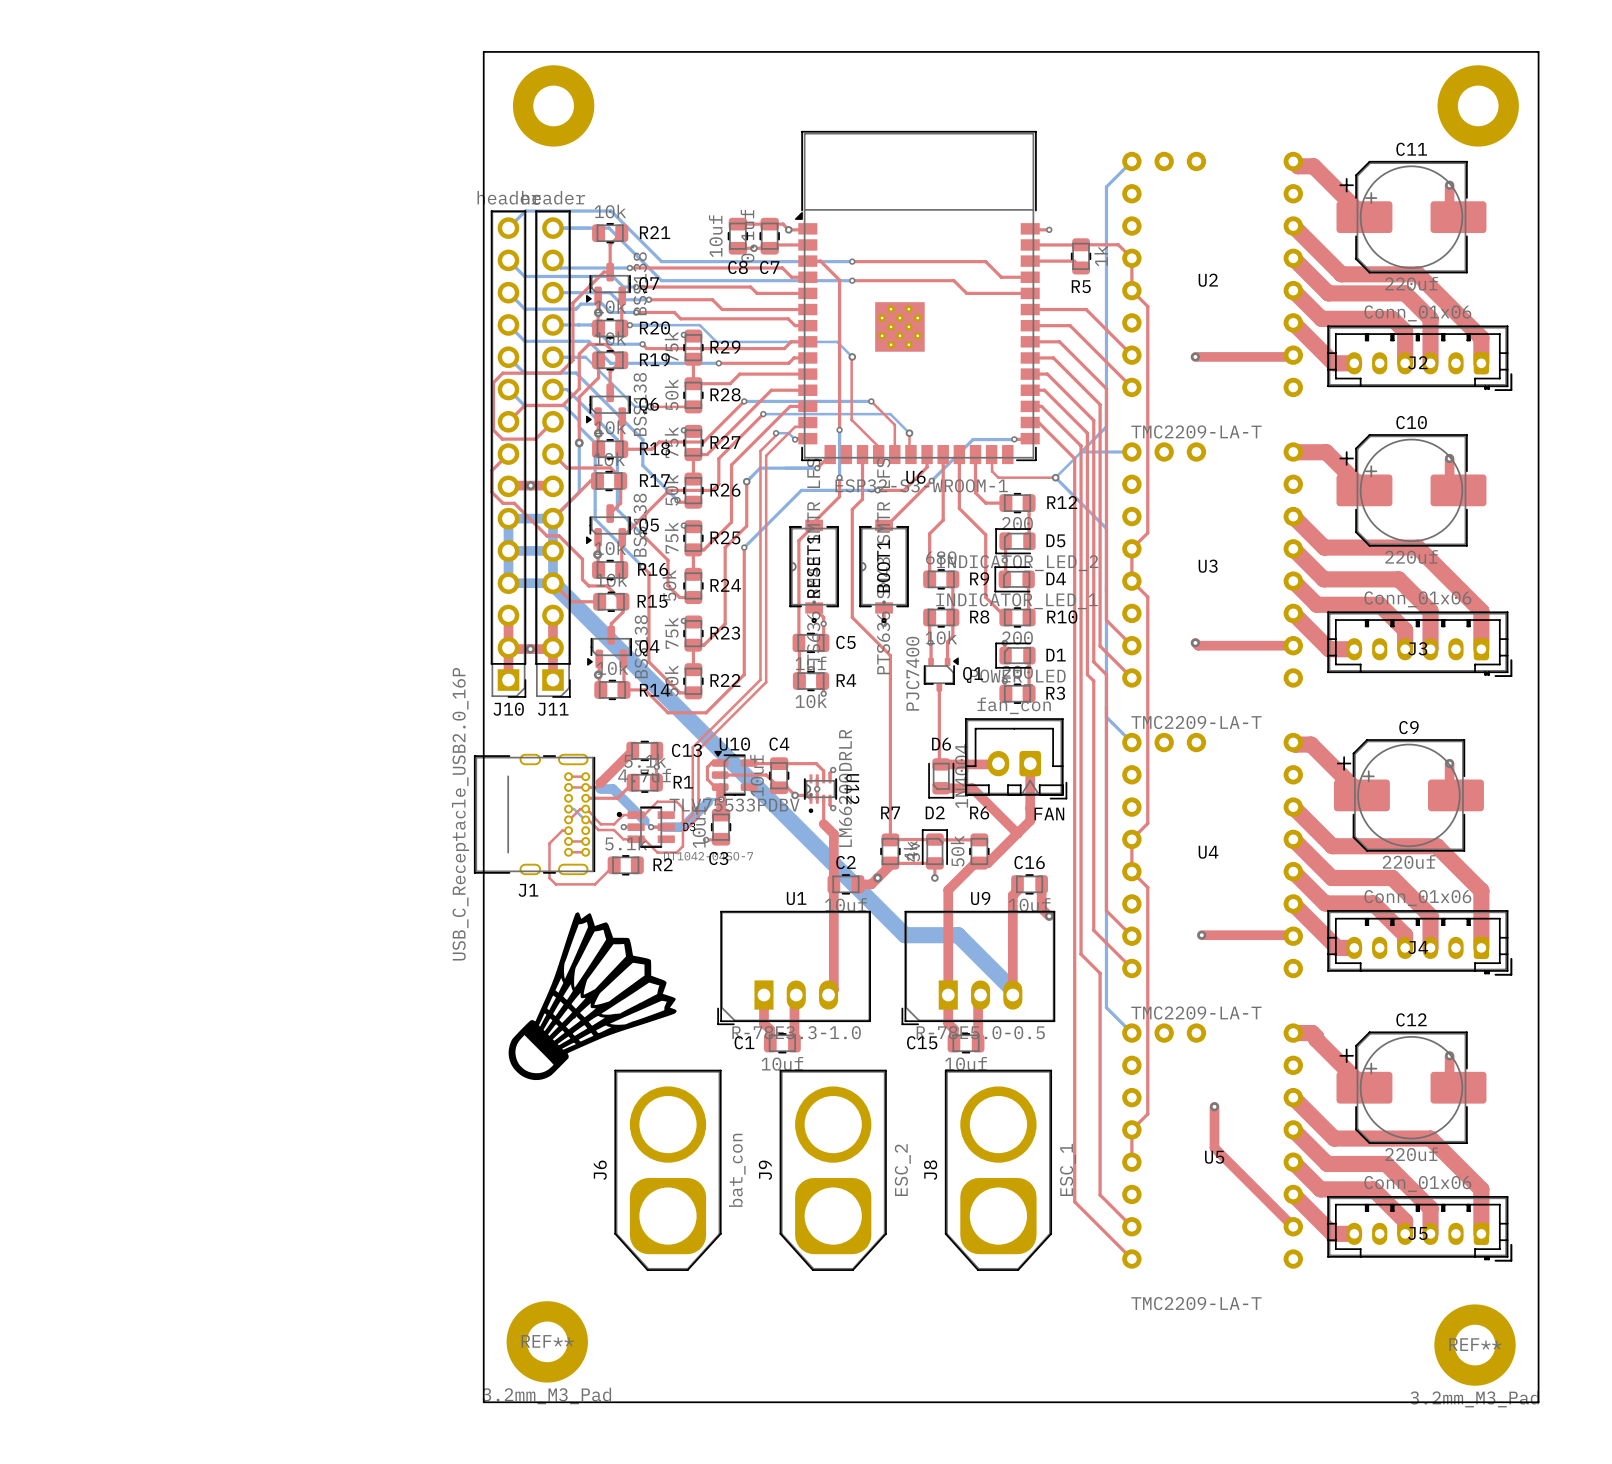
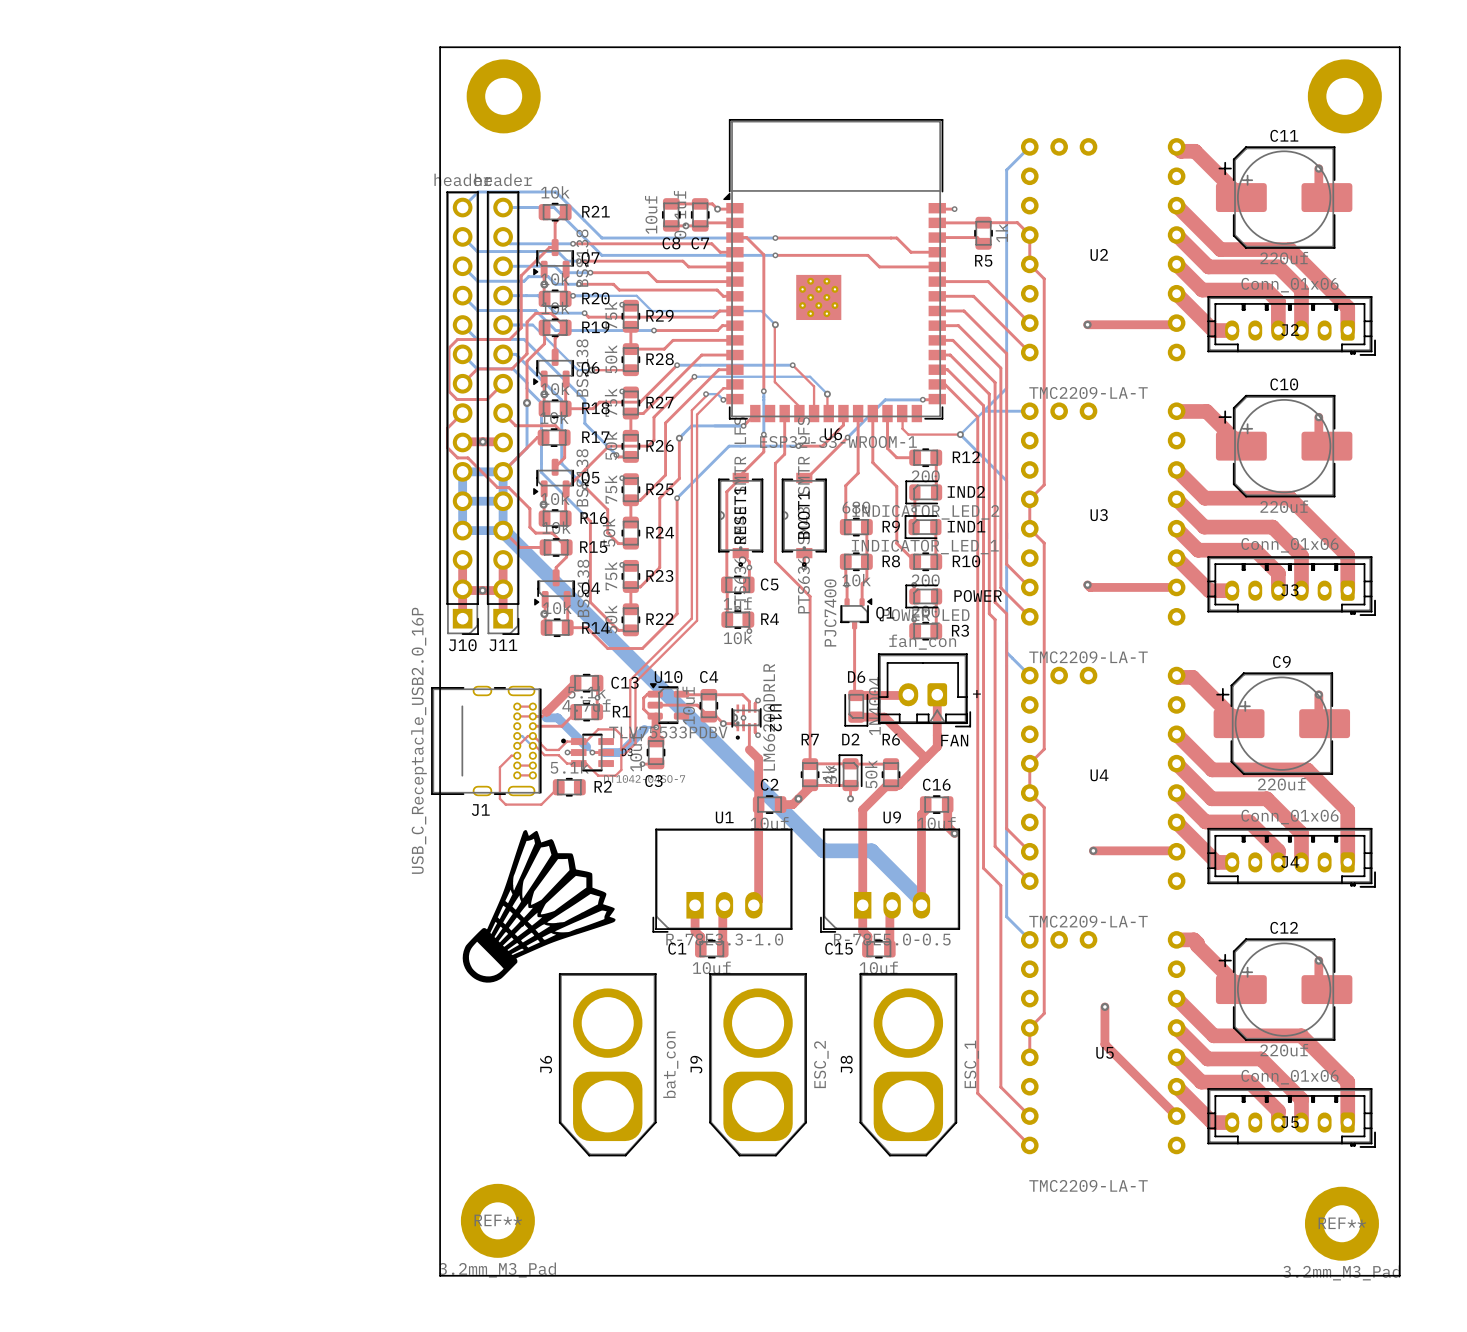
D5 name: D5 (1055, 540) -> IND2 (966, 491)
D4 name: D4 (1056, 578) -> IND1 (966, 526)
D1 name: D1 (1056, 655) -> POWER (978, 596)
text: none -> + (976, 694)

